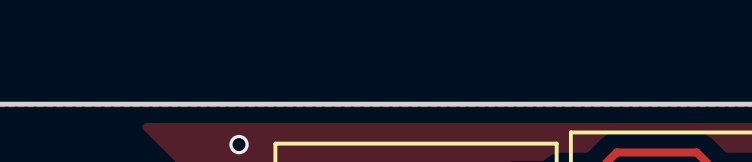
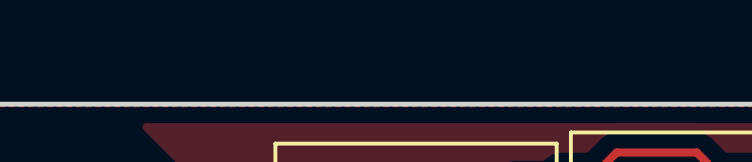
via: (239, 144) -> none

